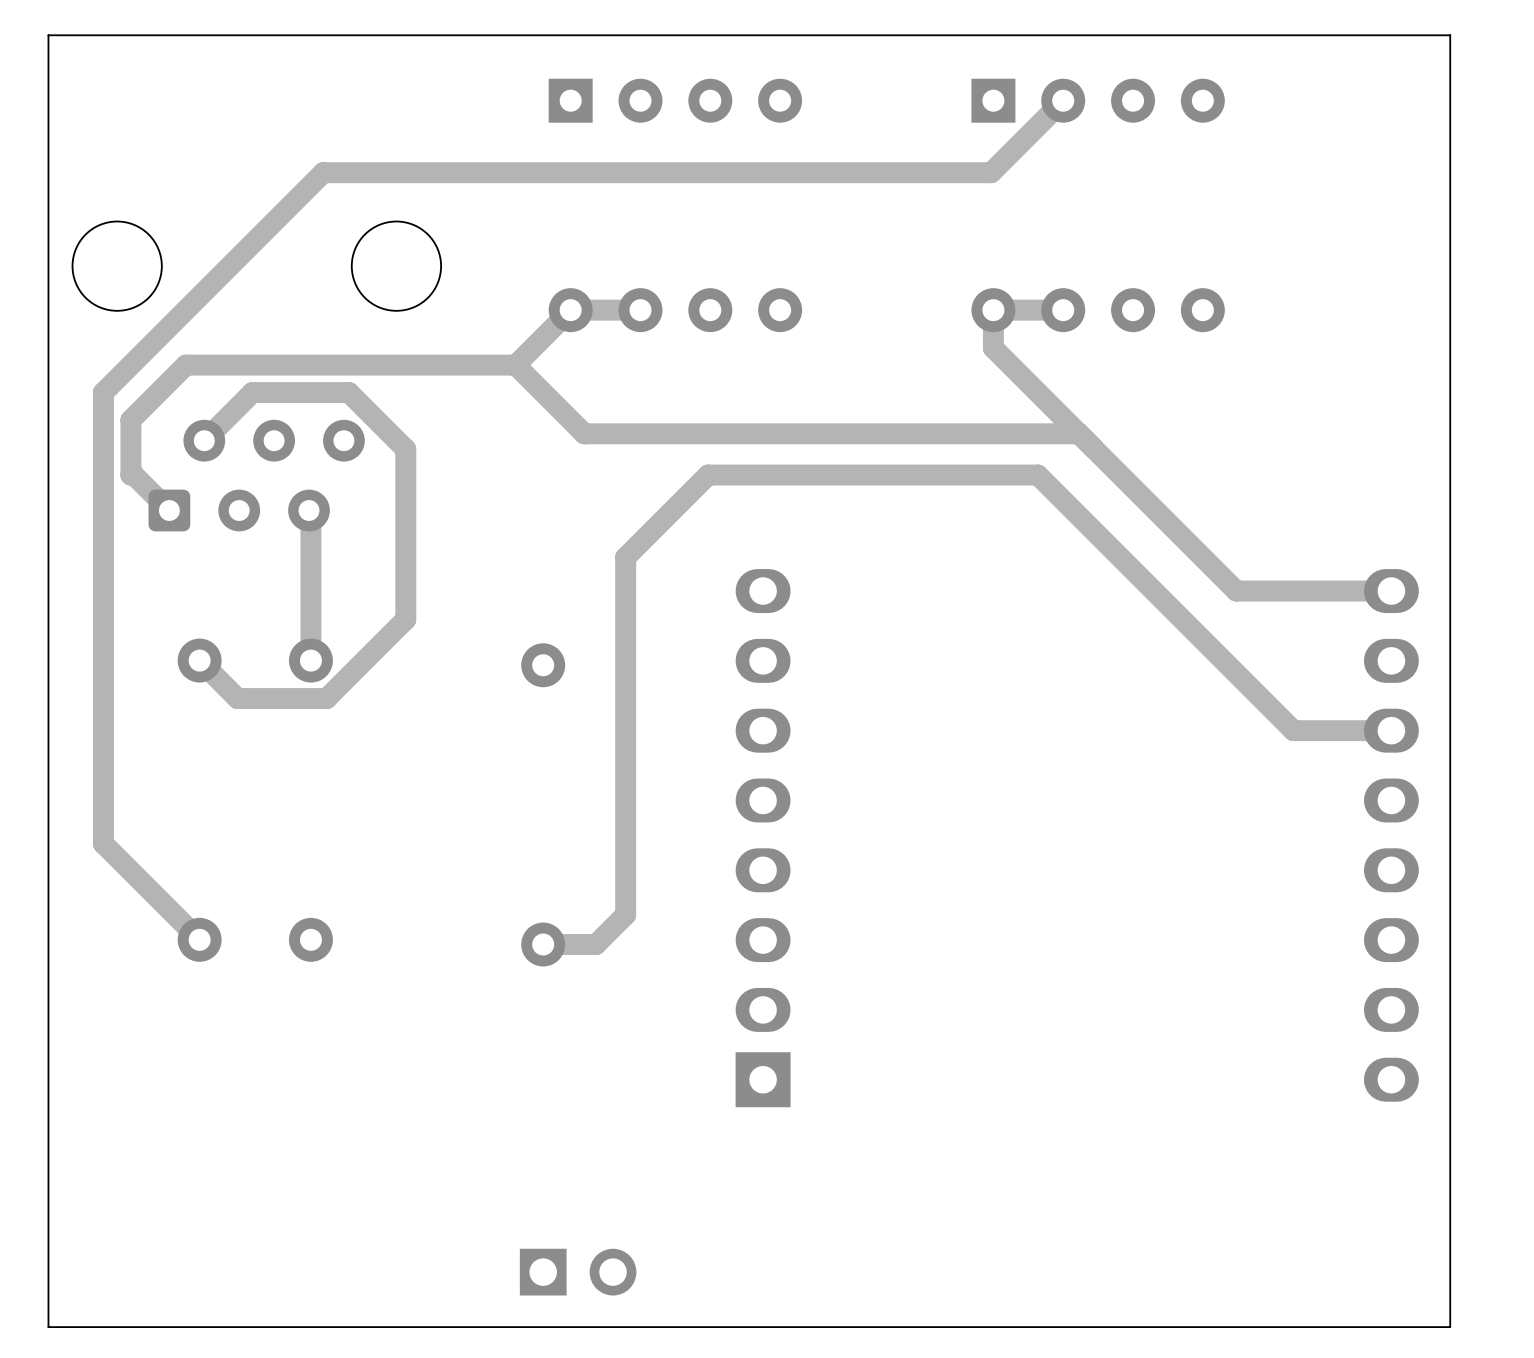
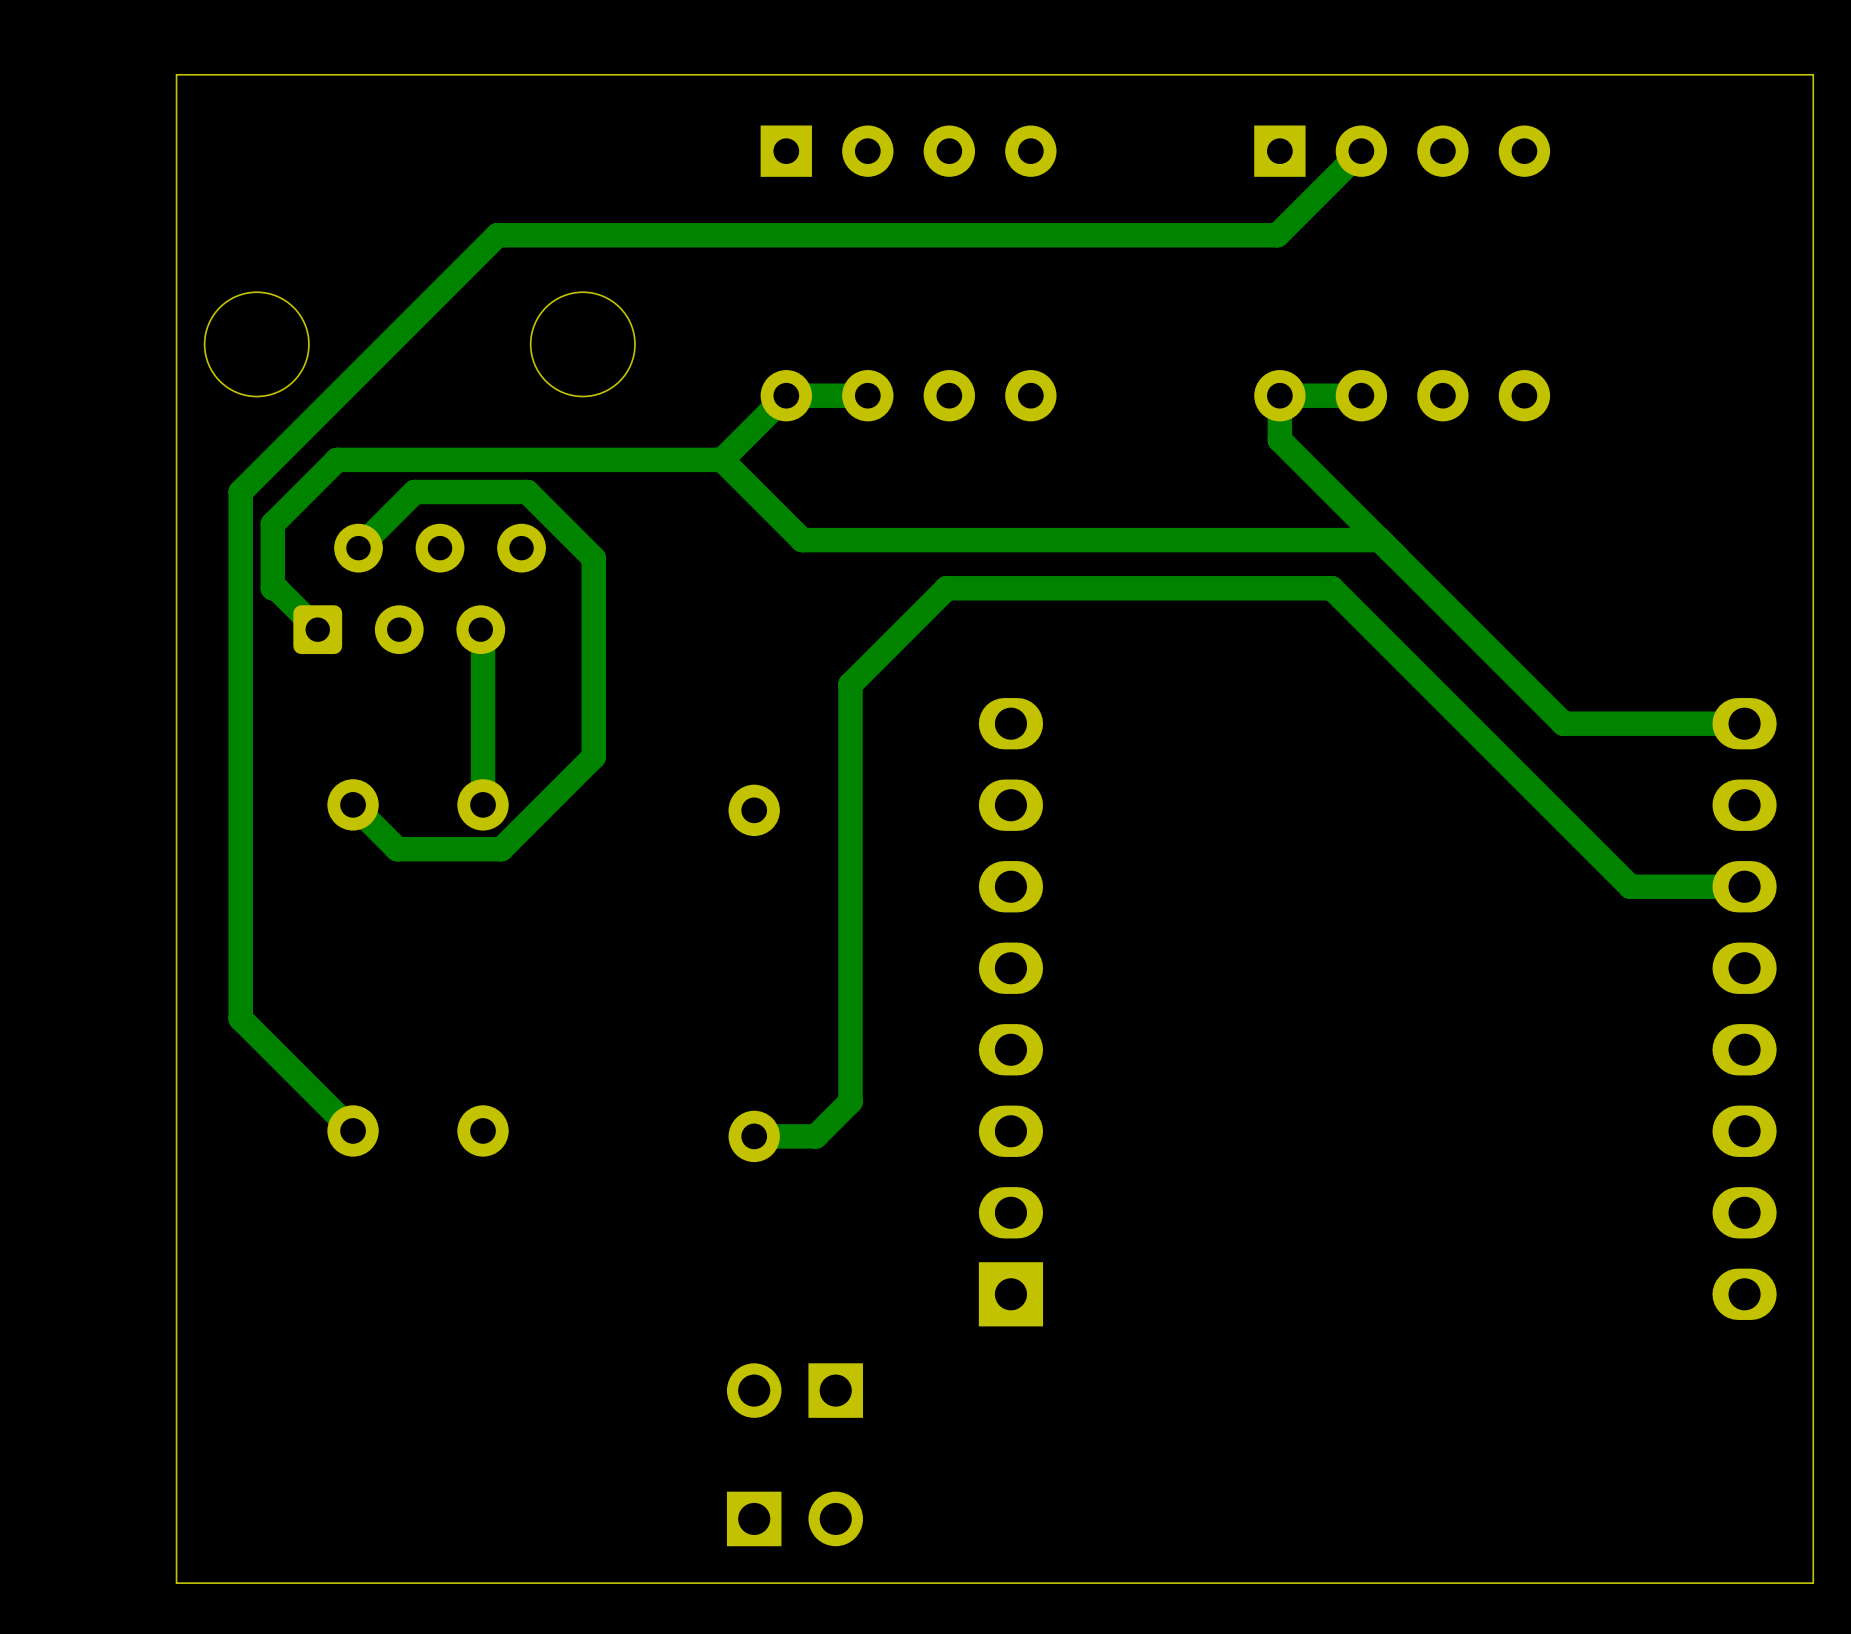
part: none -> (794, 1390)

